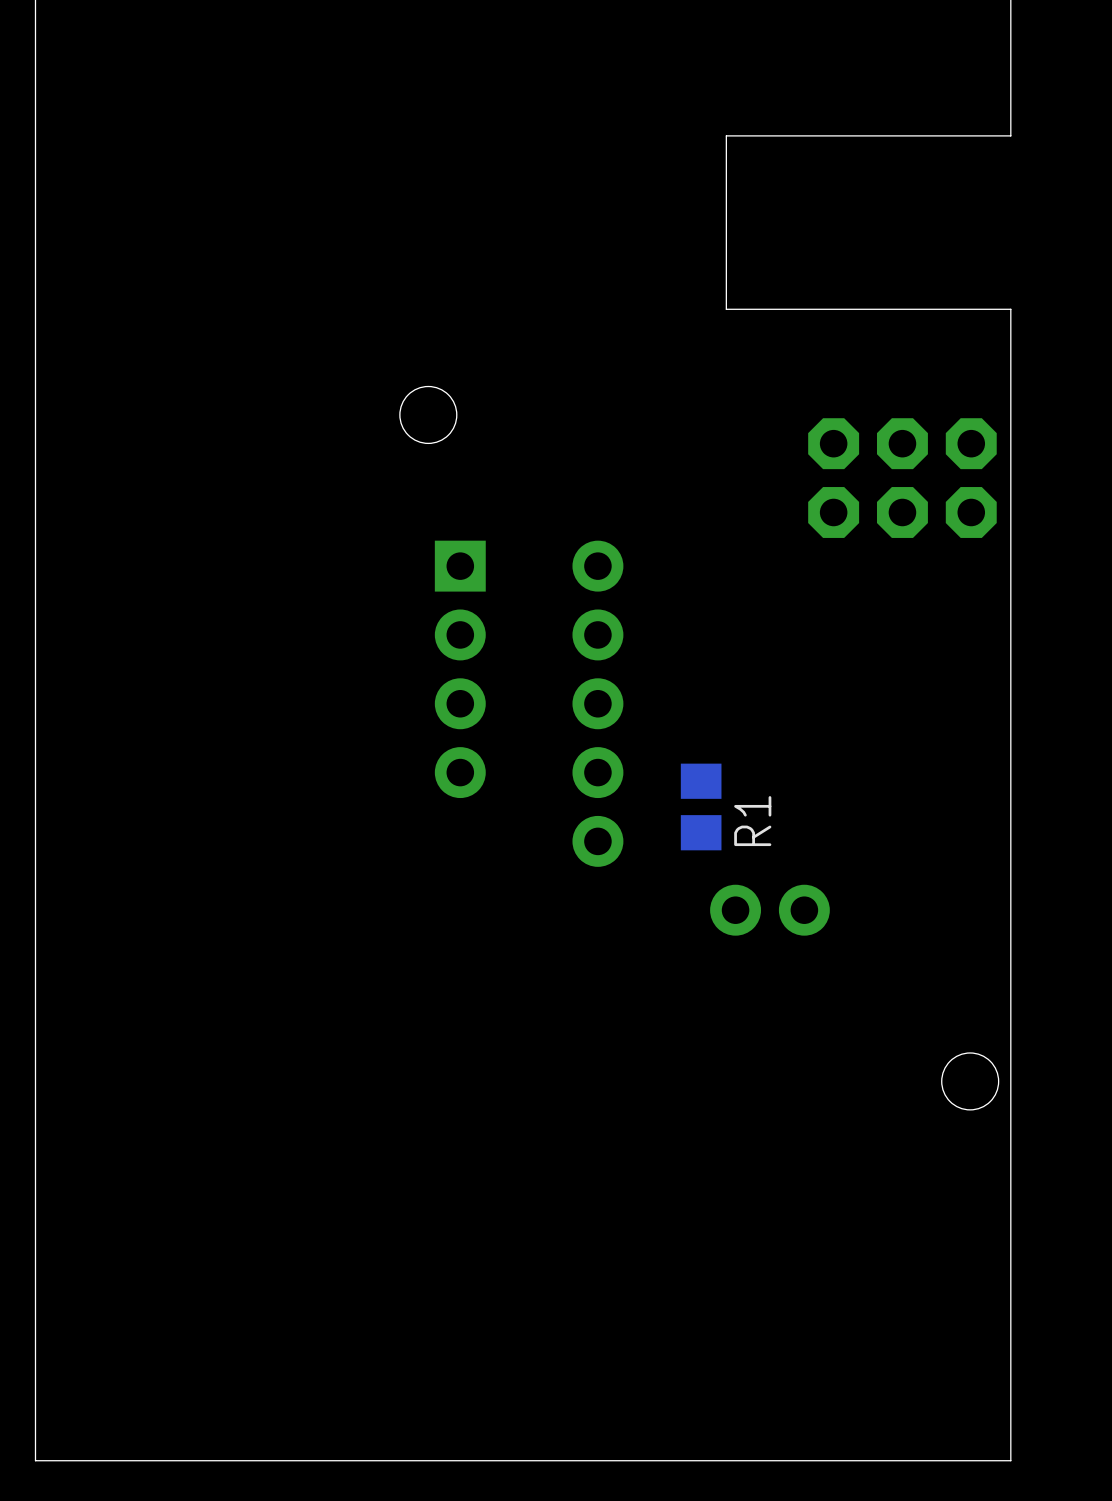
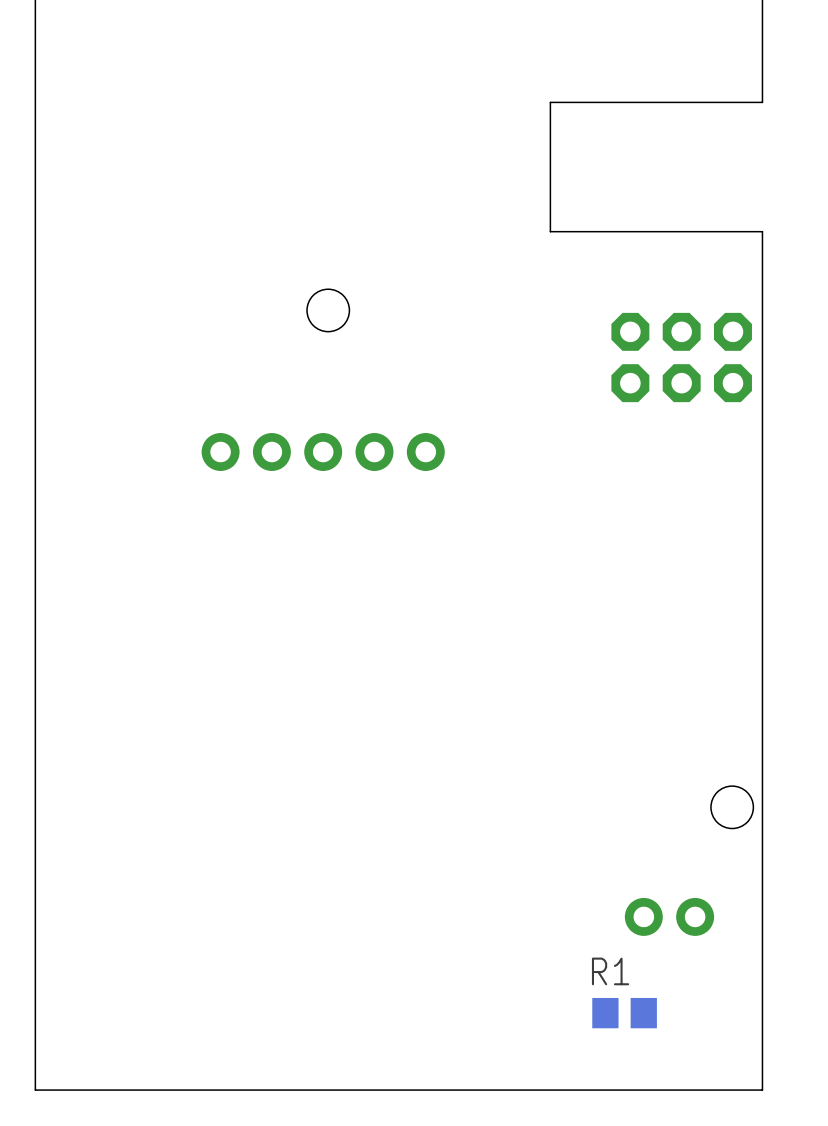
part: (460, 669) -> none
part rotation: 0° (597, 703) -> 90° clockwise (323, 452)
part position: (597, 703) -> (323, 452)
R1 rotation: 0° (701, 806) -> 90° clockwise (624, 1013)
R1 position: (701, 806) -> (624, 1013)
R1 name position: R1 (752, 821) -> R1 (610, 971)
part position: (769, 910) -> (669, 916)

